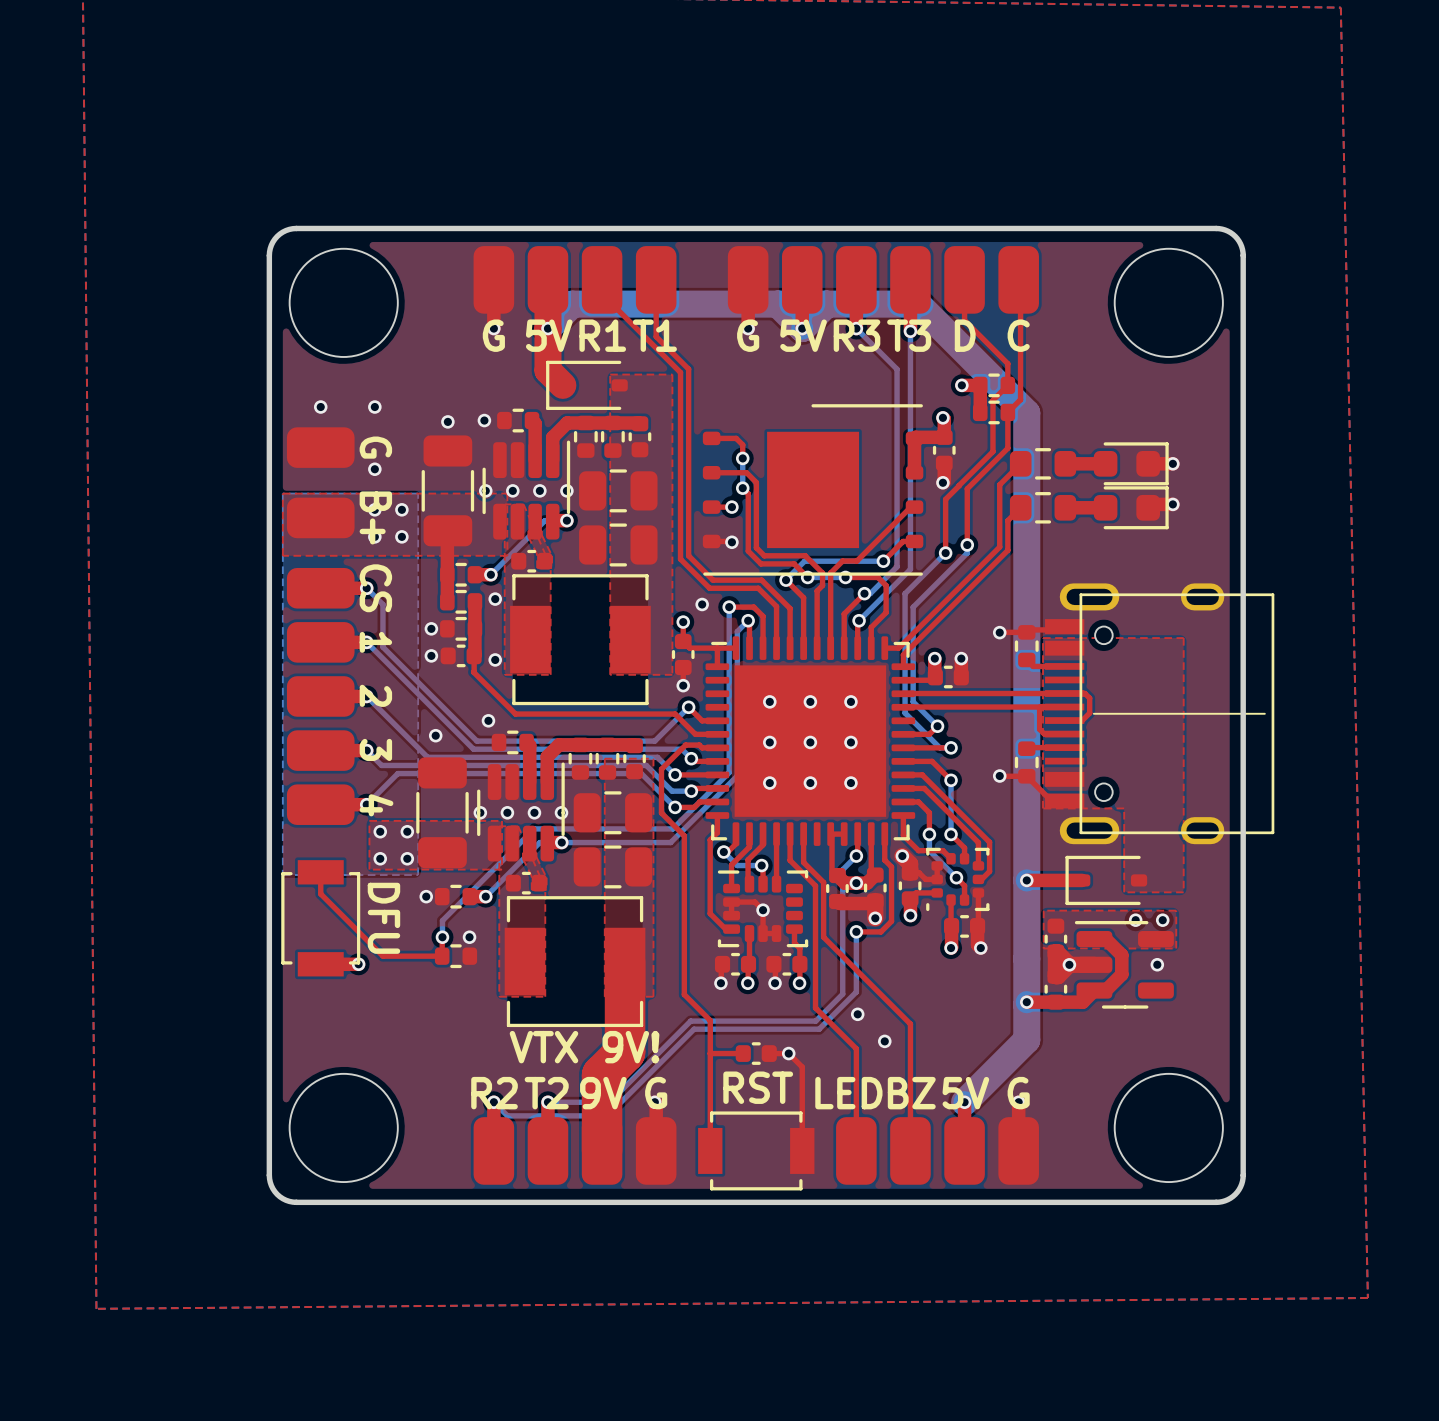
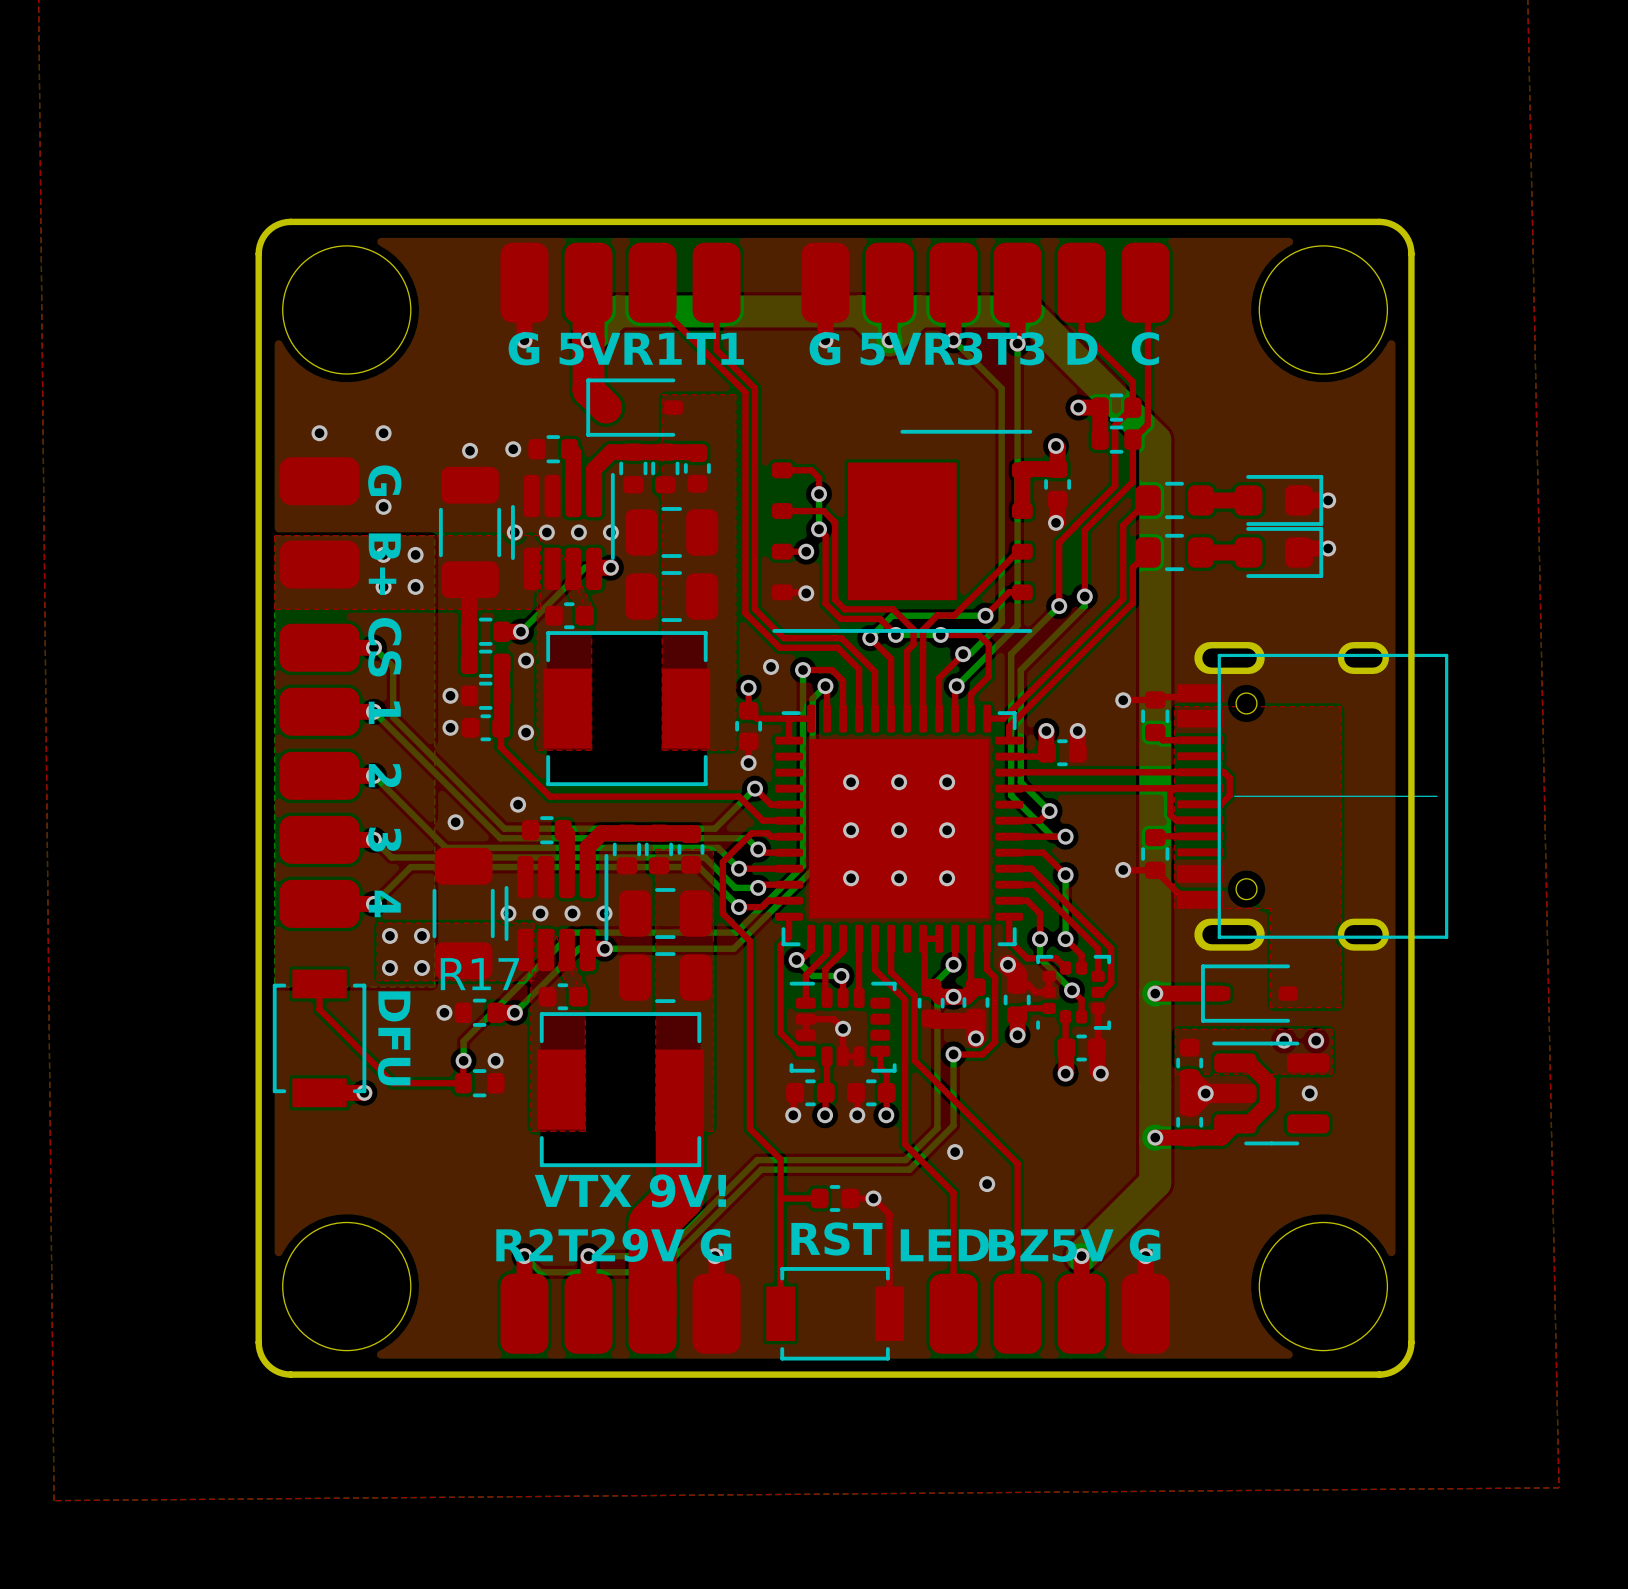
R17 name: none -> R17 (479, 974)

